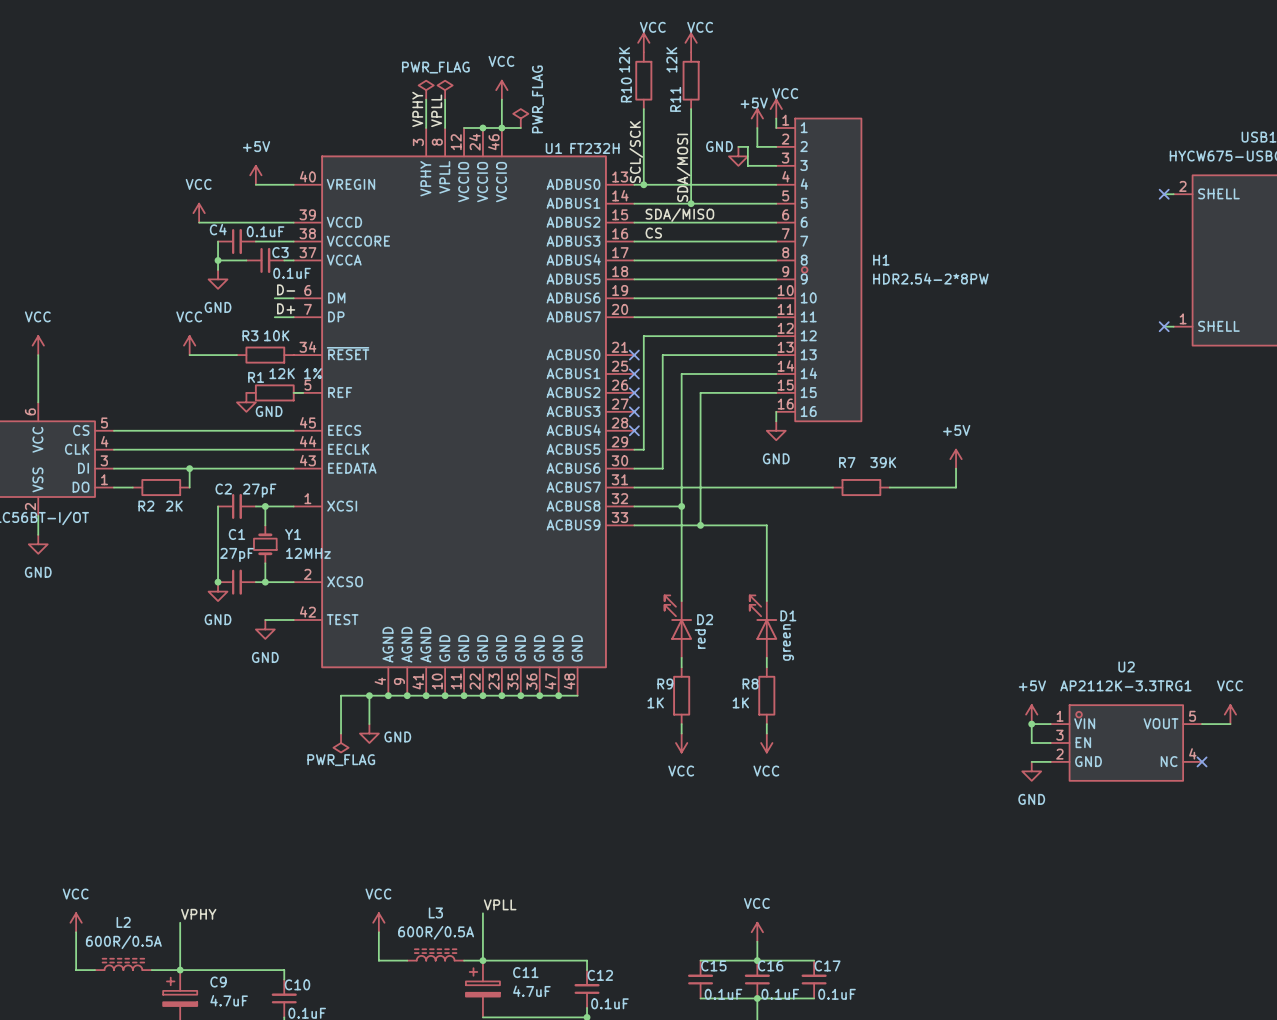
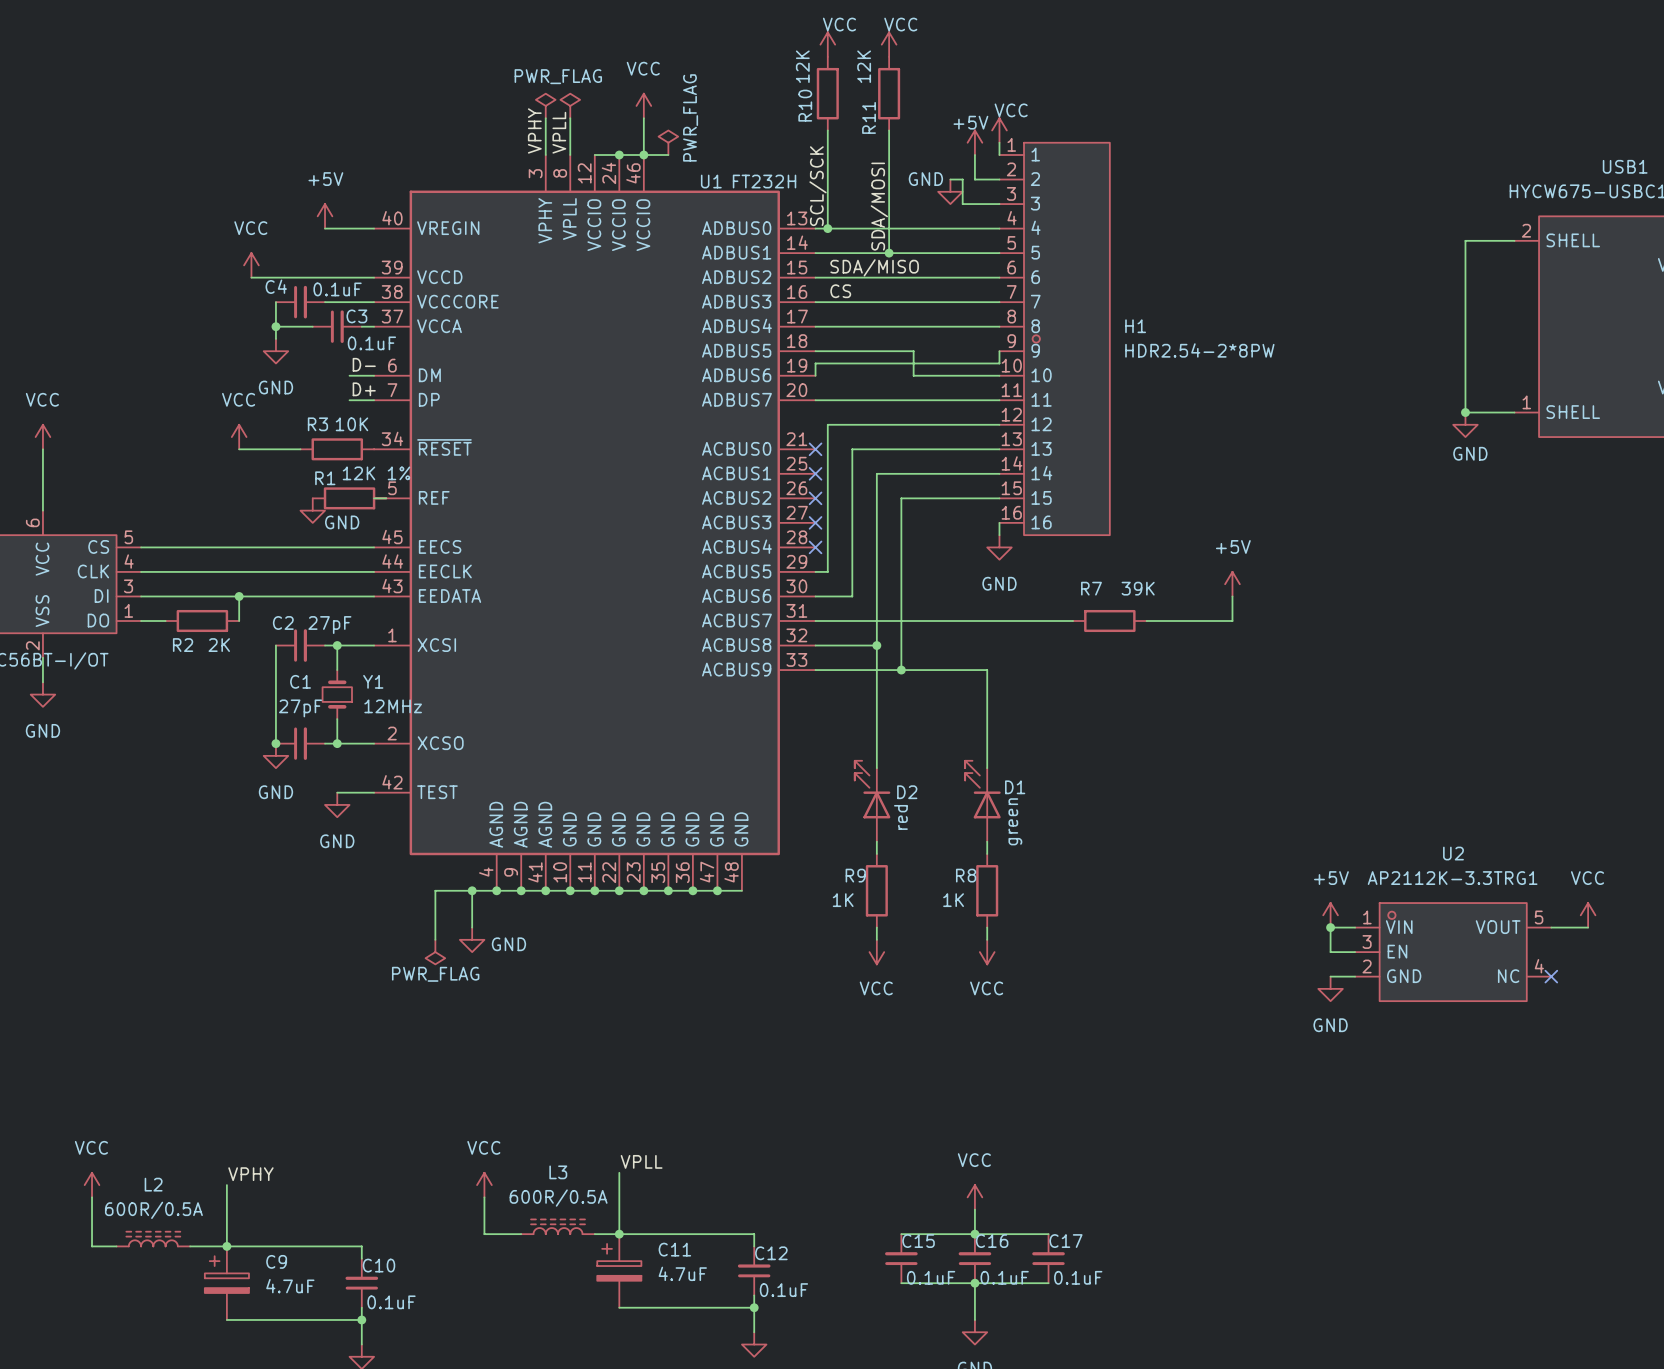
wire: none -> (1502, 240) (1465, 240) (1465, 412) (1502, 412)
no-connect mark: (1164, 194) -> none
wire: (710, 279) (776, 279) -> (913, 351) (913, 375)
wire: (634, 298) (710, 298) -> (815, 375) (815, 363) (999, 363) (999, 351)
junction: none -> (1465, 412)
no-connect mark: (1164, 326) -> none
power symbol: none -> GND (1465, 424)

